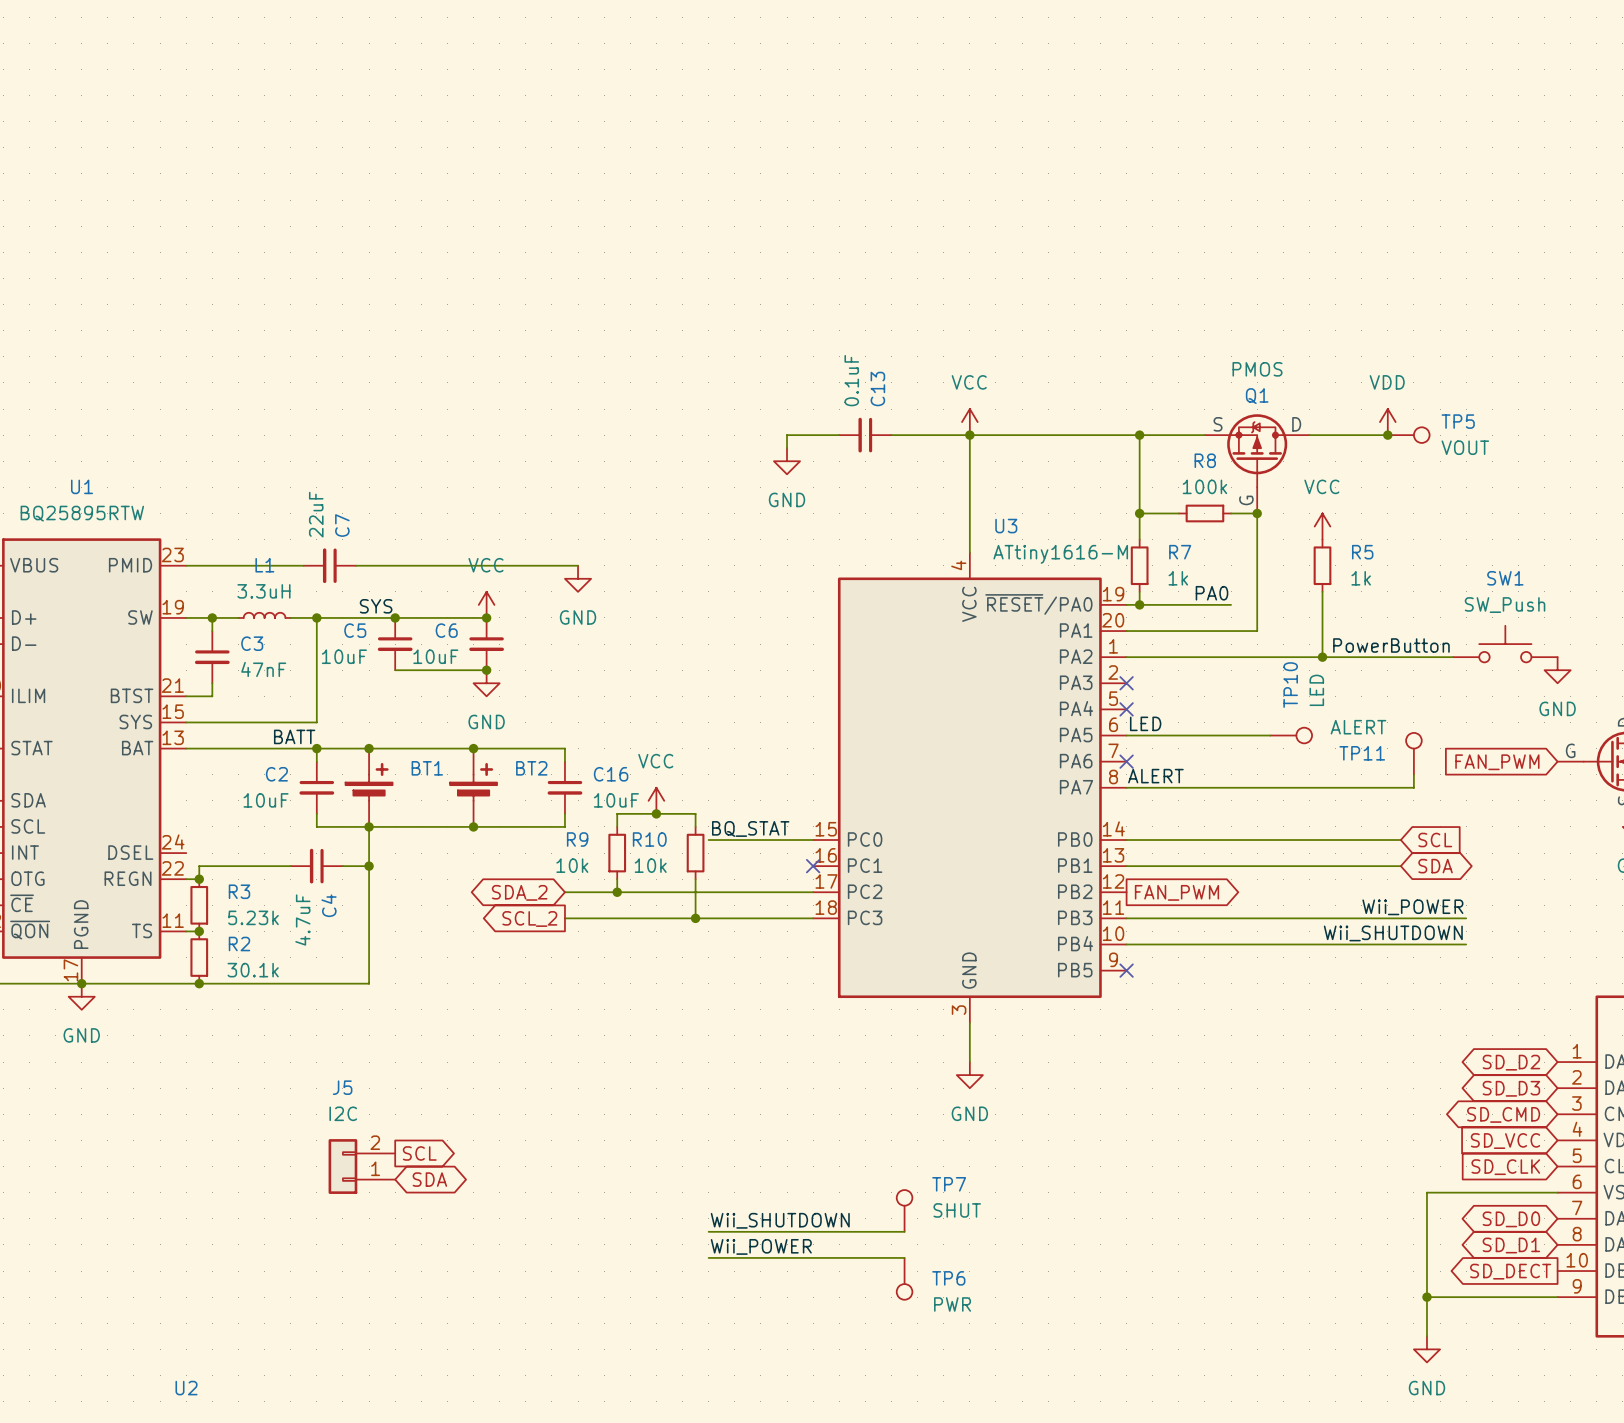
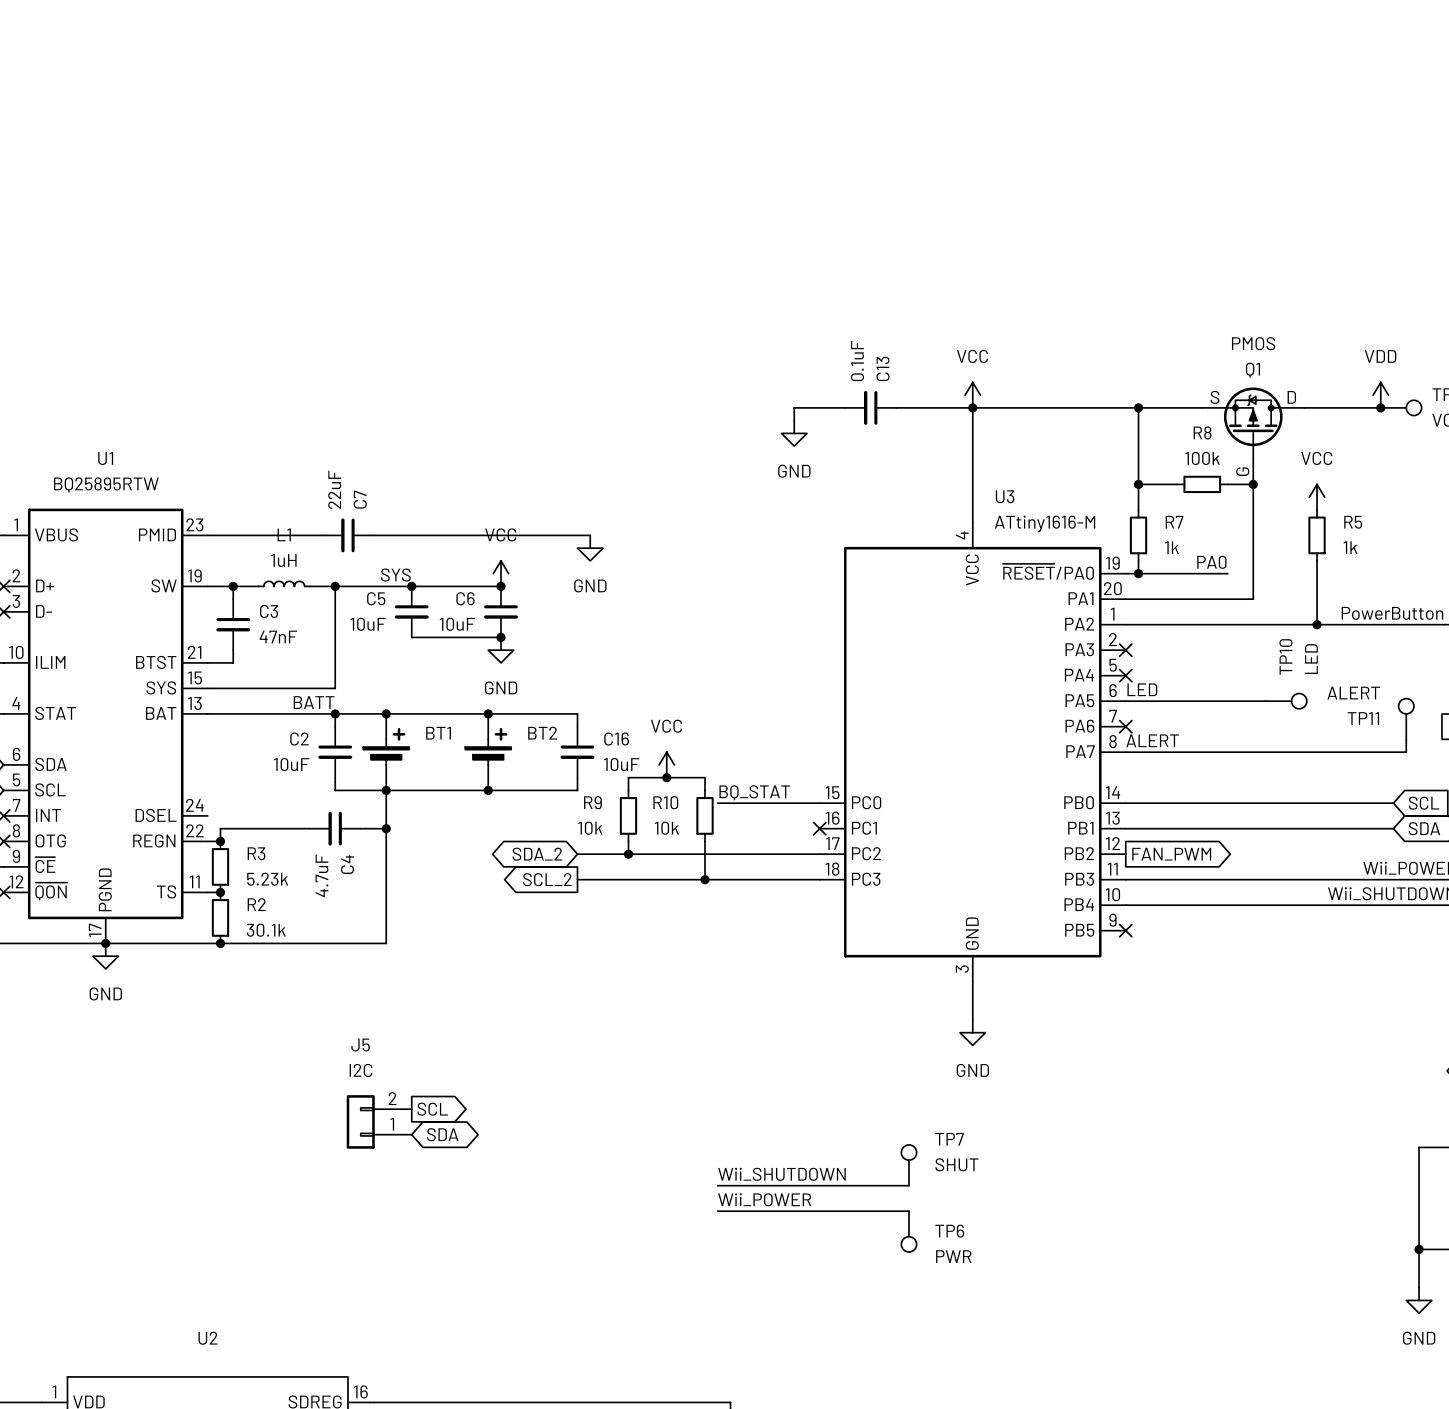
L1 value: 3.3uH (263, 591) -> 1uH (283, 560)

